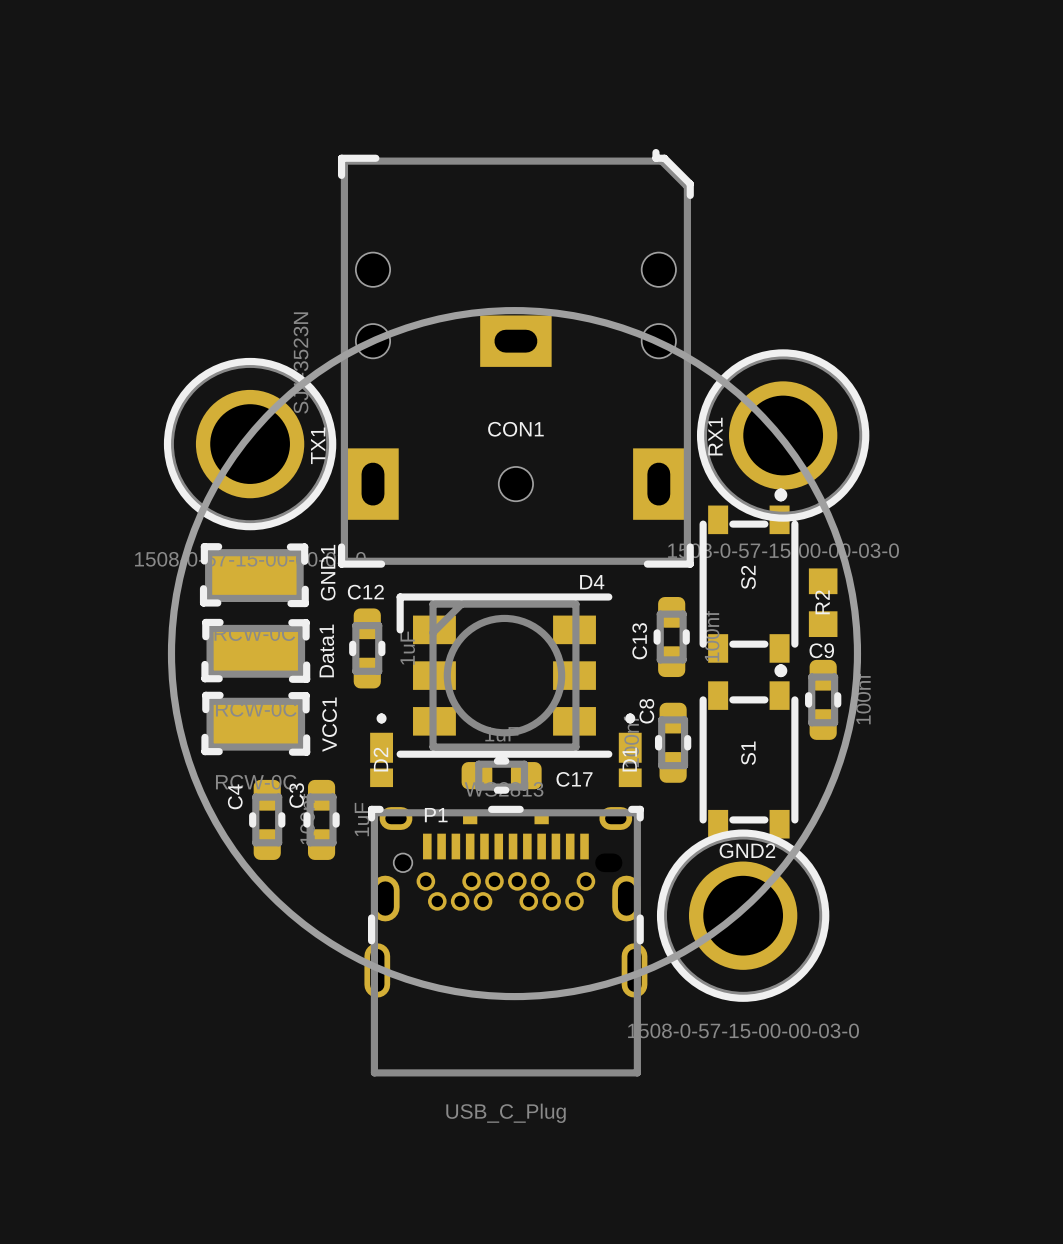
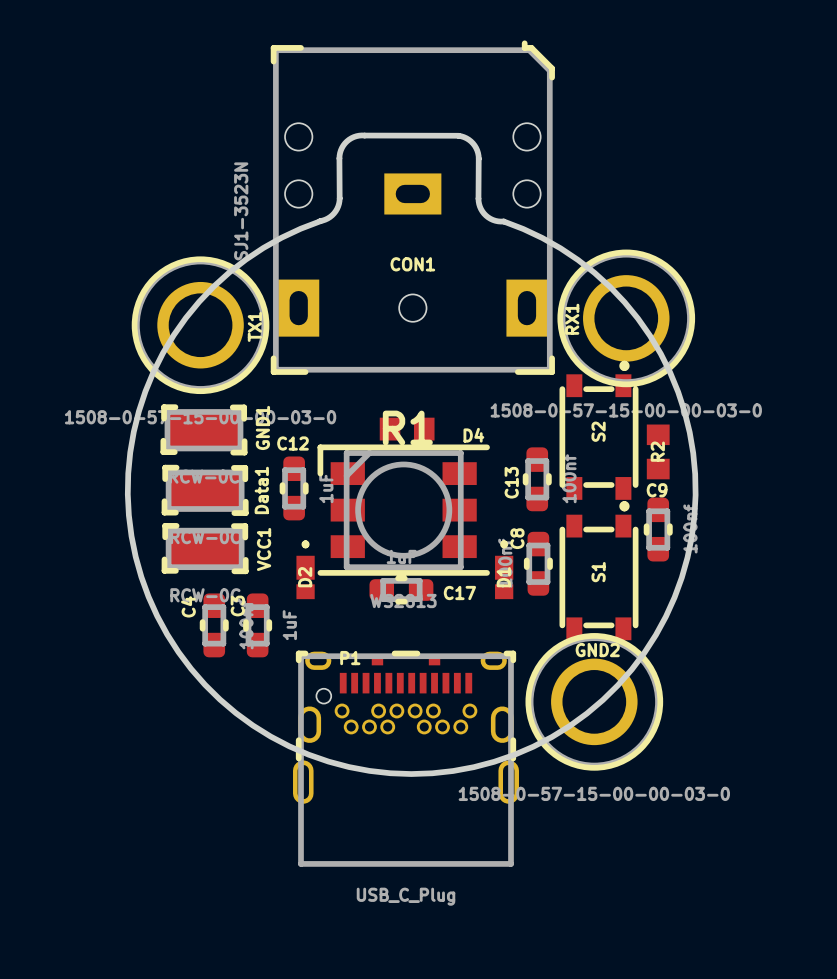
round board edge: [167, 307, 862, 1001] -> none
board edge: none -> (320, 221) (330, 217) (338, 206) (340, 152) (345, 143) (351, 138) (361, 135) (458, 135) (466, 138) (474, 145) (478, 153) (478, 201) (484, 213) (492, 219) (503, 221) (523, 229) (560, 248) (594, 272) (610, 287) (637, 318) (660, 353) (670, 372) (684, 412) (693, 453) (695, 495) (694, 516) (691, 536) (681, 577) (665, 616) (644, 652) (631, 669) (617, 685) (586, 713) (552, 736) (514, 754) (494, 761) (473, 767) (432, 773) (411, 774) (369, 770) (328, 761) (308, 754) (270, 736) (235, 713) (204, 684) (191, 668) (167, 634) (148, 596) (141, 577) (131, 536) (128, 515) (128, 473) (133, 431) (138, 411) (153, 371) (162, 353) (185, 318) (199, 301) (229, 272) (245, 259) (281, 237) (320, 221)
CON1 position: (515, 358) -> (412, 207)
R1: none -> (407, 429)
P1 position: (505, 941) -> (405, 758)

